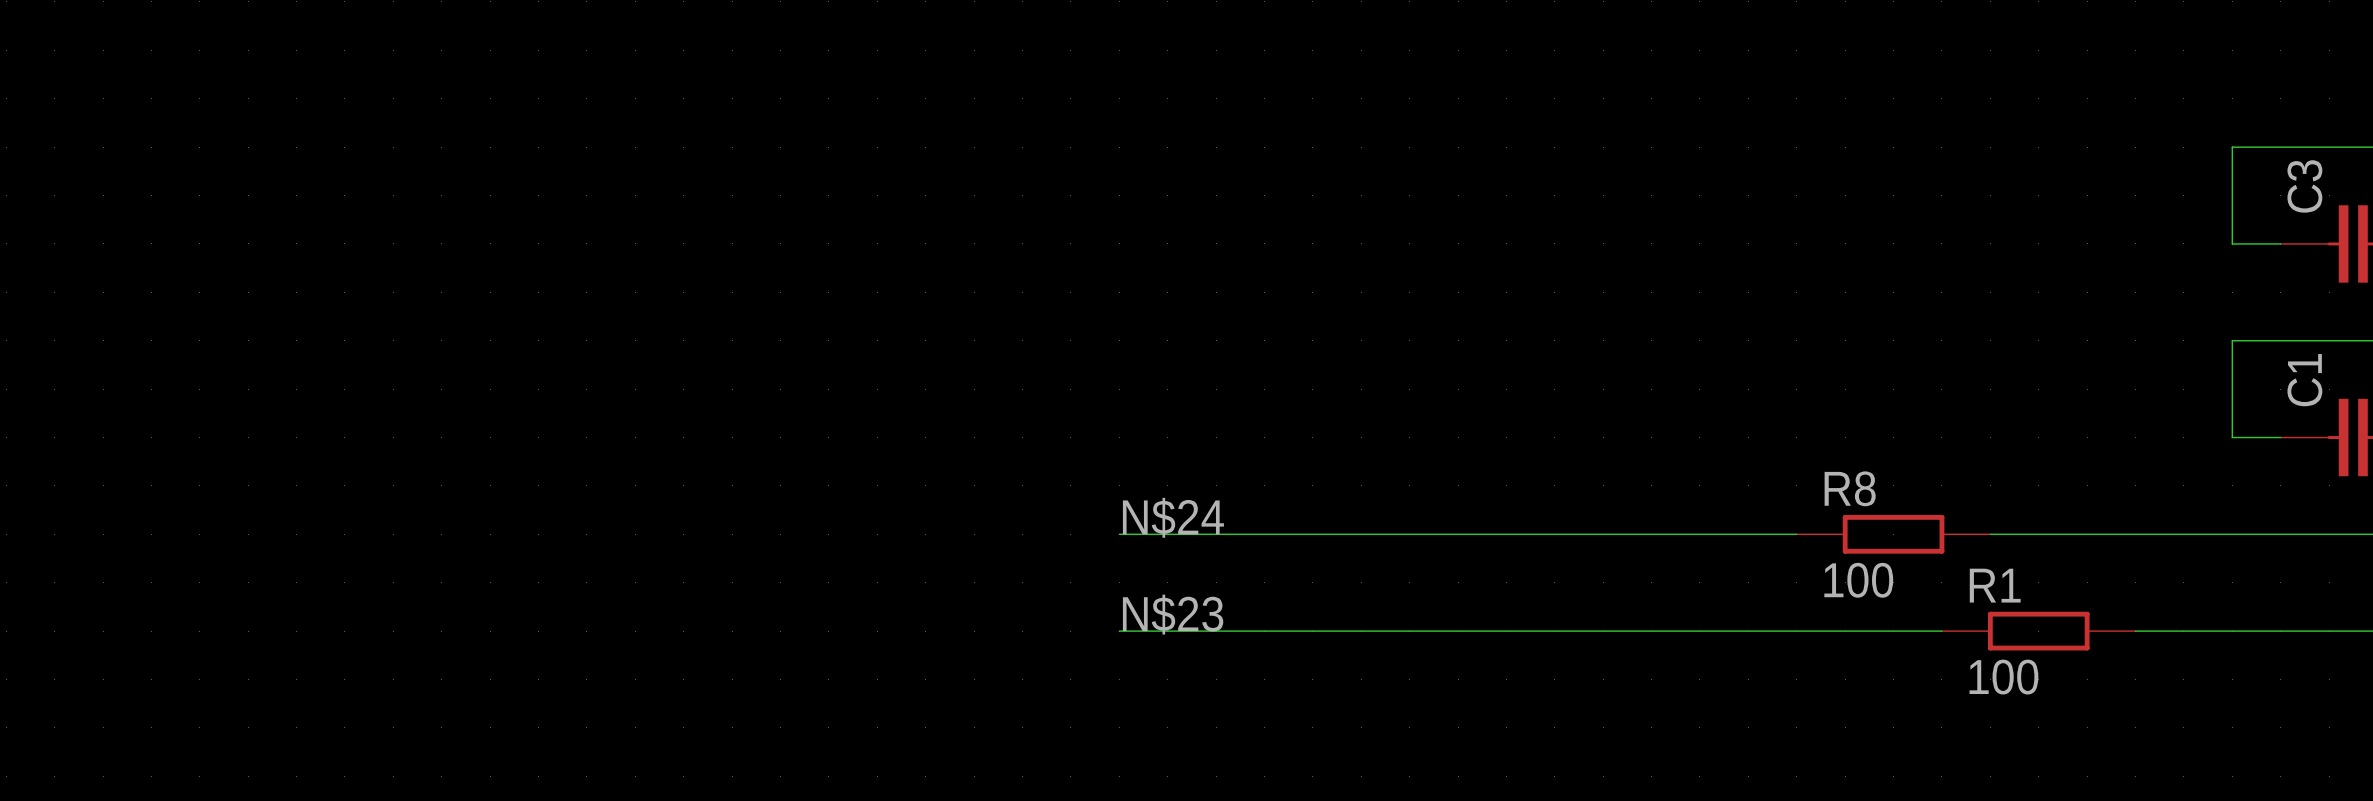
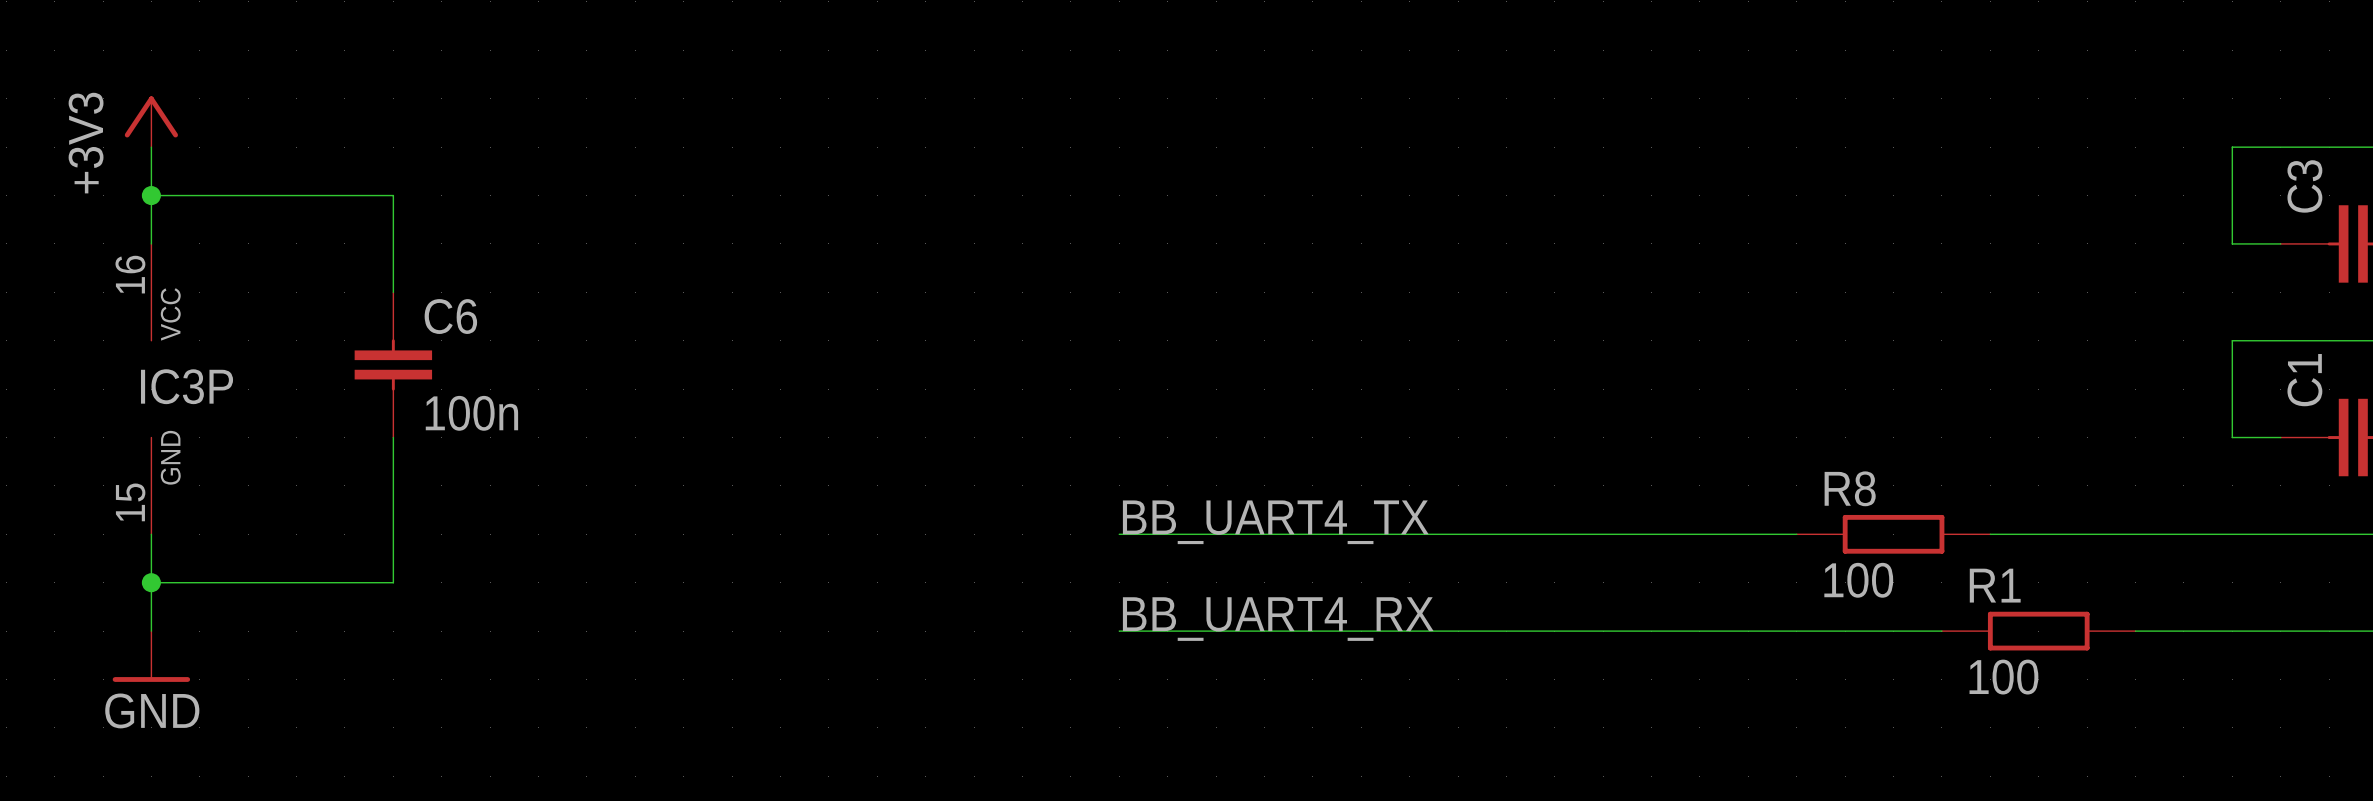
power symbol: none -> +3V3 (151, 121)
wire: none -> (151, 147) (151, 243)
wire: none -> (151, 195) (393, 195) (393, 292)
junction: none -> (151, 195)
C6: none -> 100n (393, 364)
IC3P: none -> (151, 389)
wire: none -> (393, 437) (393, 582) (151, 582)
label: N$24 (1173, 517) -> BB_UART4_TX (1275, 522)
wire: none -> (151, 534) (151, 631)
junction: none -> (151, 582)
label: N$23 (1173, 614) -> BB_UART4_RX (1278, 619)
power symbol: none -> GND (151, 656)

